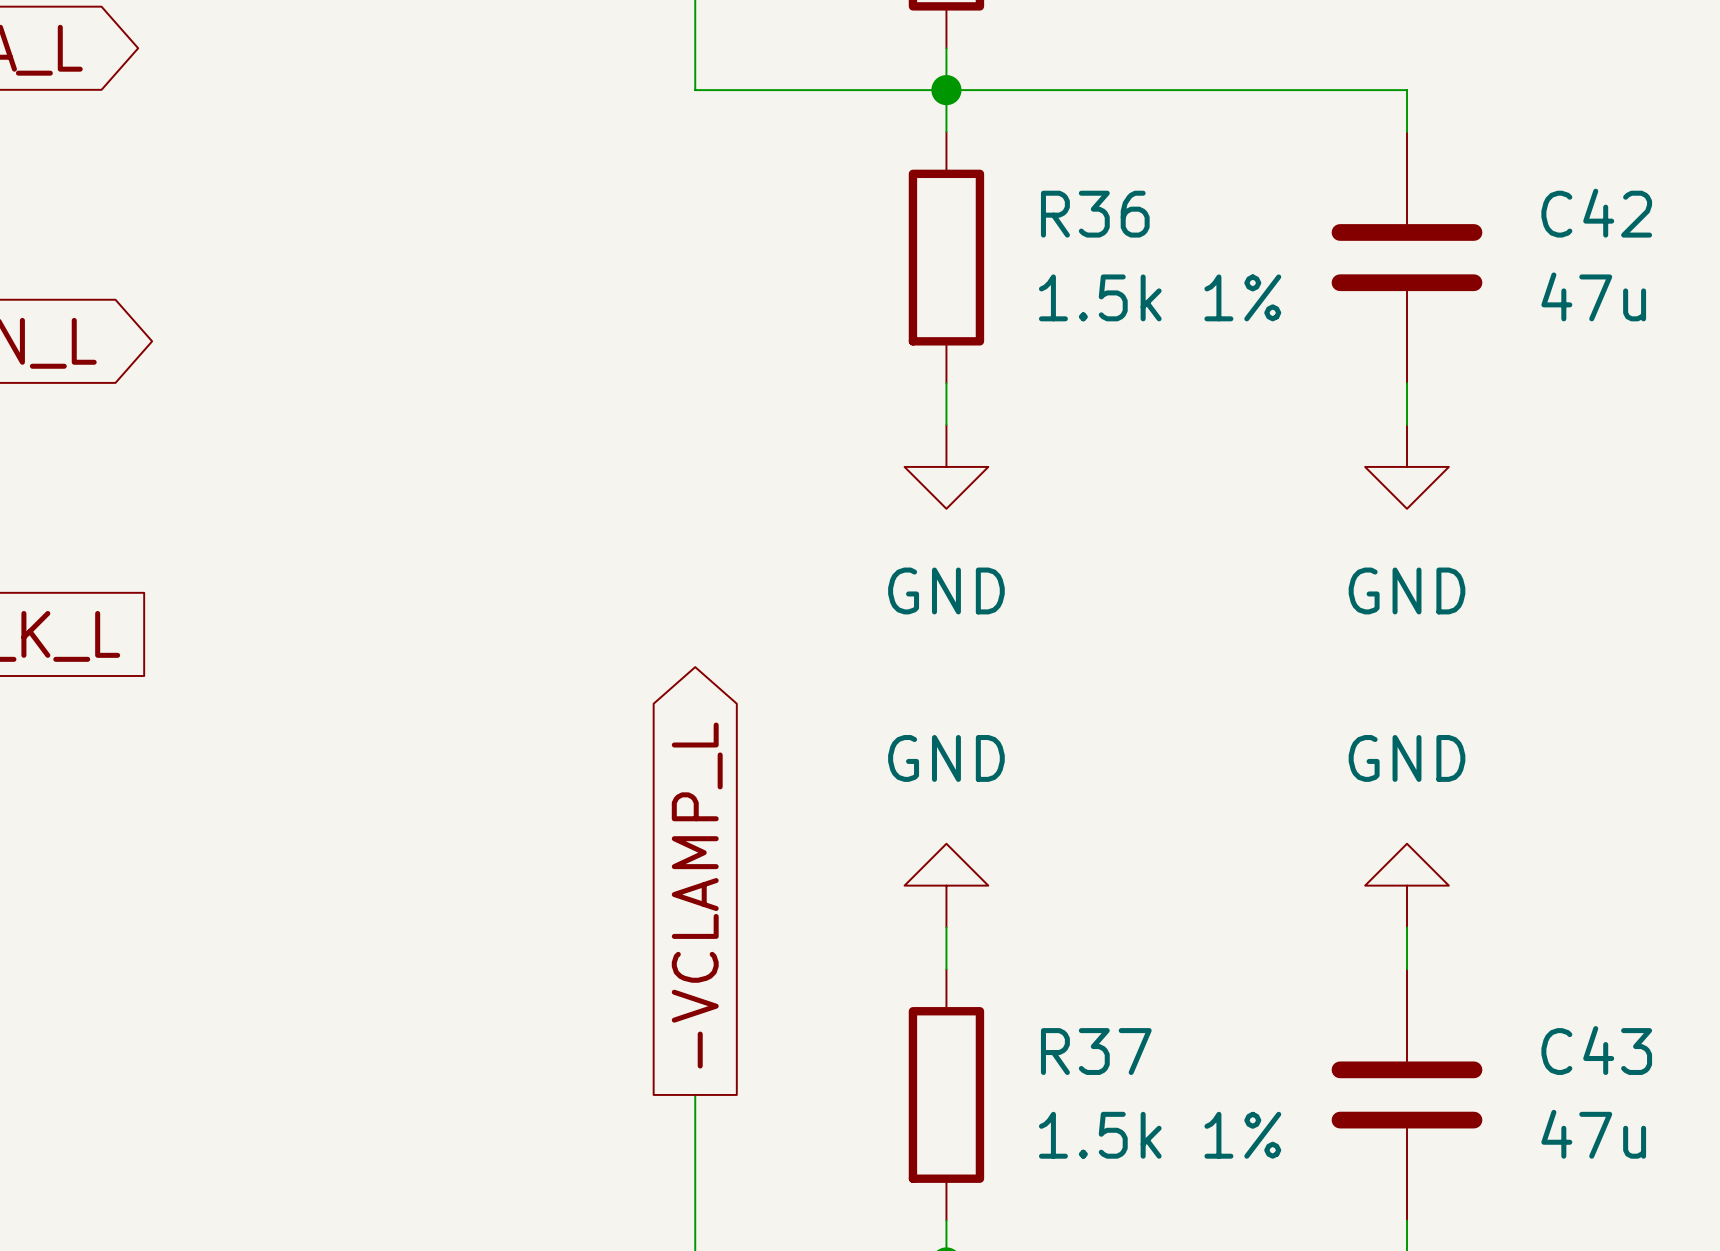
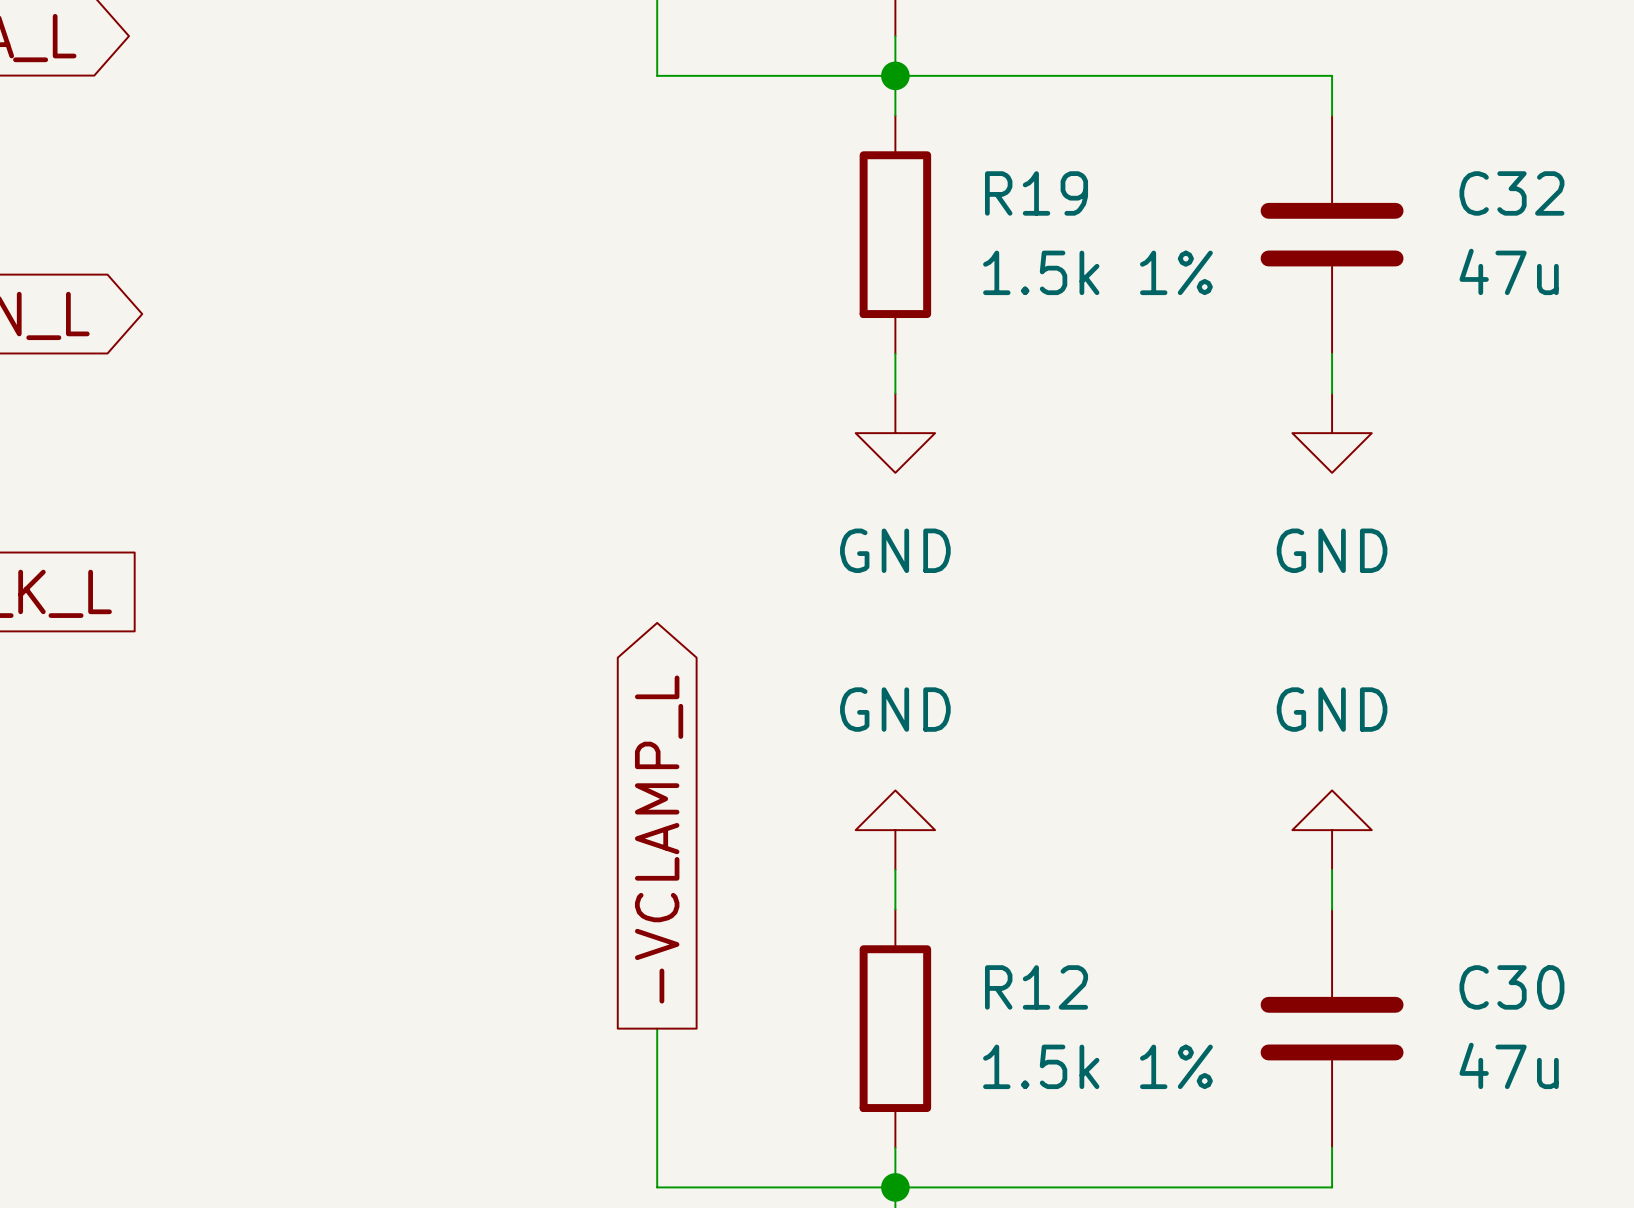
C42 name: C42 (1596, 213) -> C32 (1511, 193)
R36 name: R36 (1095, 214) -> R19 (1036, 193)
C43 name: C43 (1596, 1050) -> C30 (1511, 987)
R37 name: R37 (1096, 1051) -> R12 (1036, 987)

